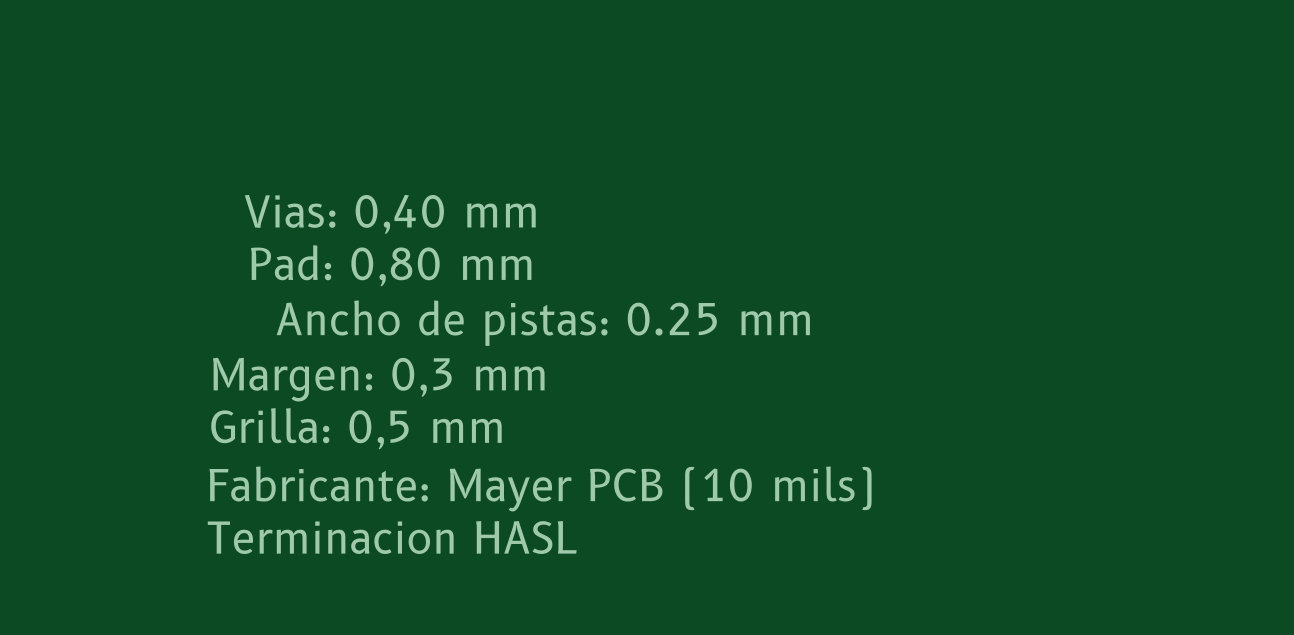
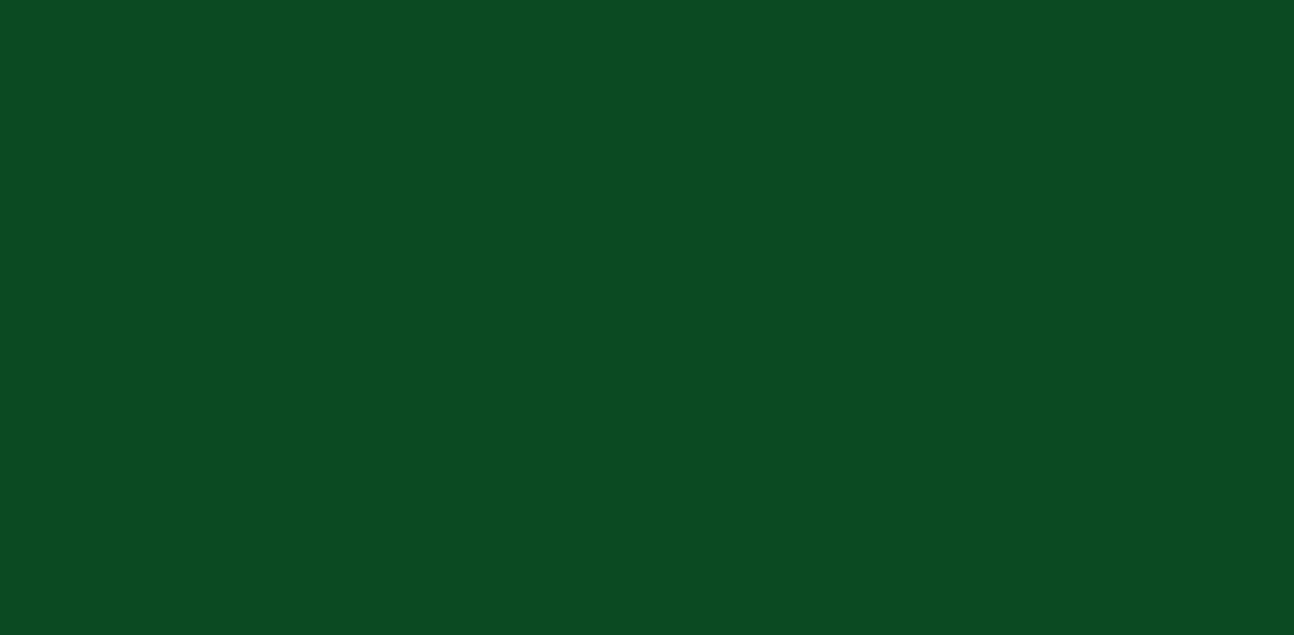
text: Vias: 0,40 mm (390, 214) -> none
text: Pad: 0,80 mm (391, 265) -> none
text: Ancho de pistas: 0.25 mm (543, 323) -> none
text: Margen: 0,3 mm (378, 379) -> none
text: Grilla: 0,5 mm (356, 428) -> none
text: Fabricante: Mayer PCB (10 mils) (540, 488) -> none
text: Terminacion HASL (392, 537) -> none

